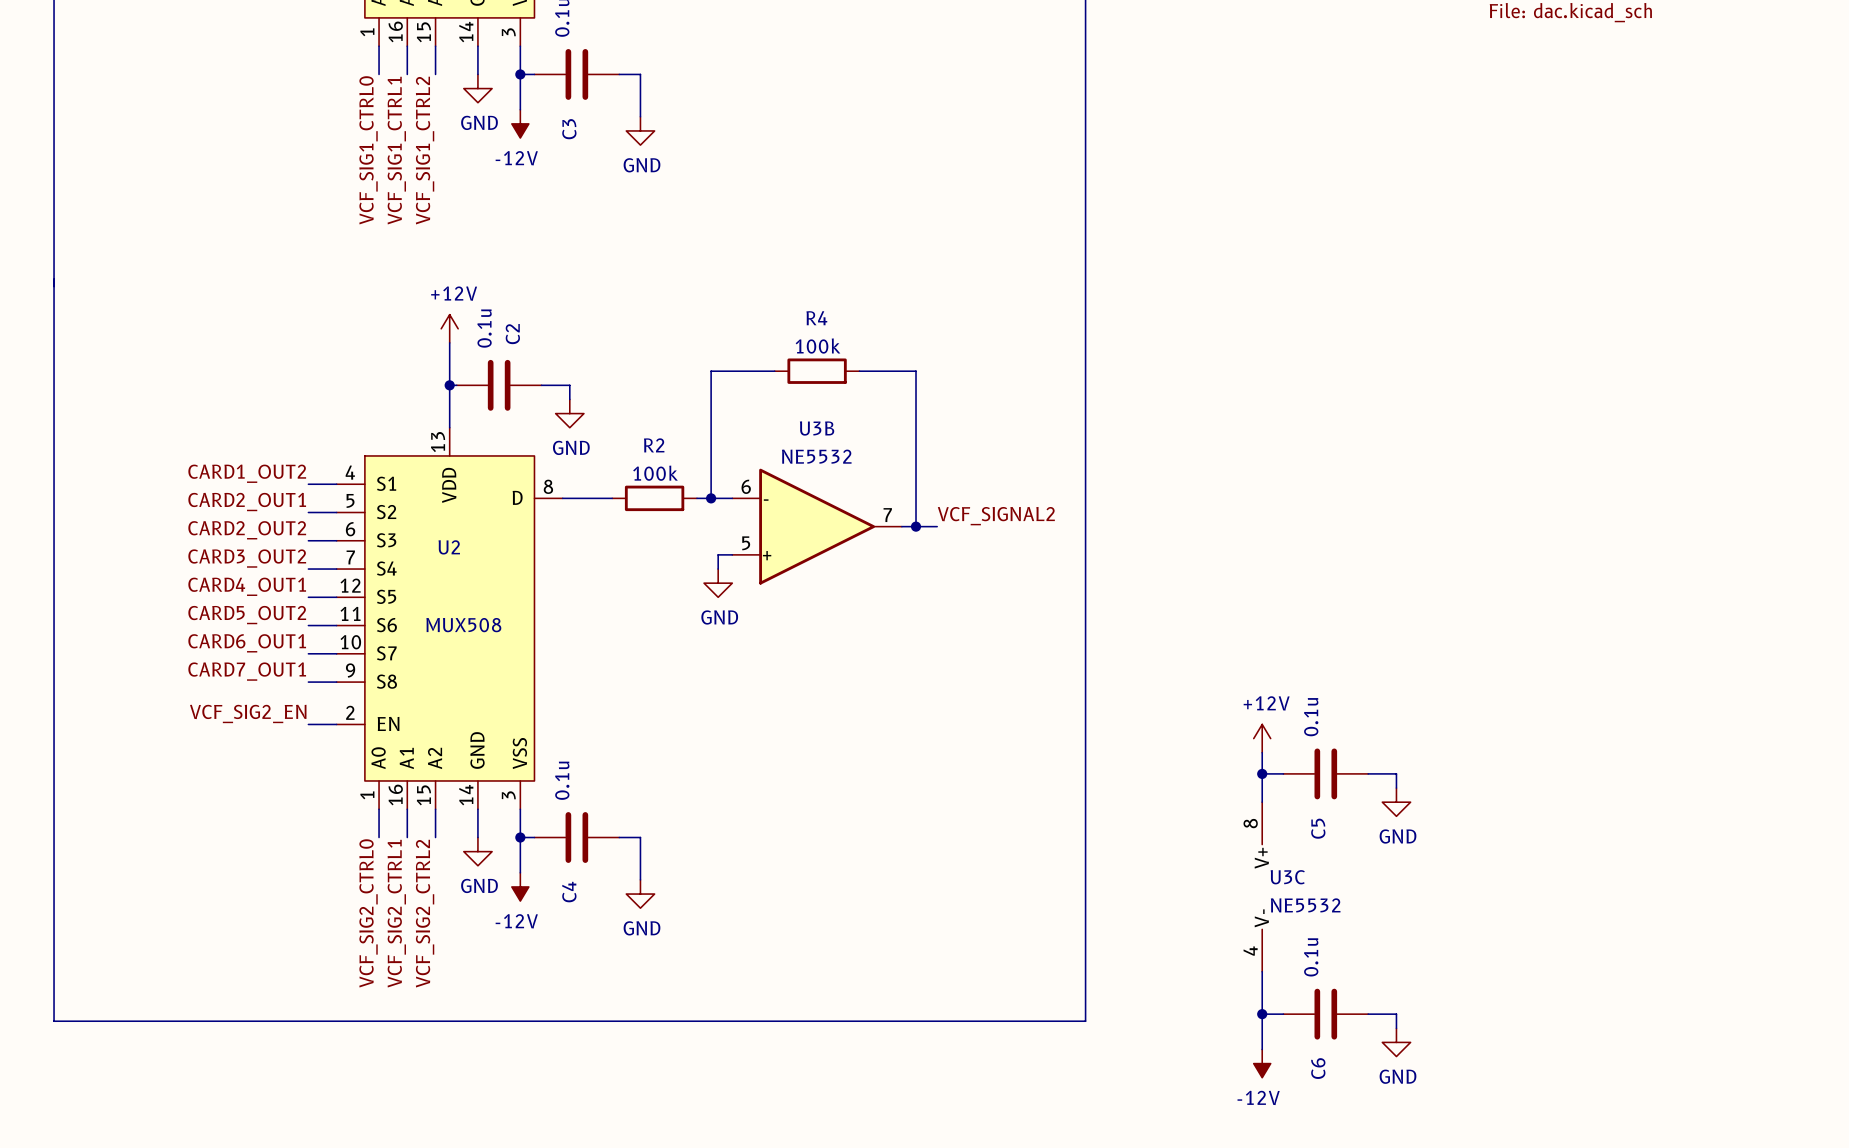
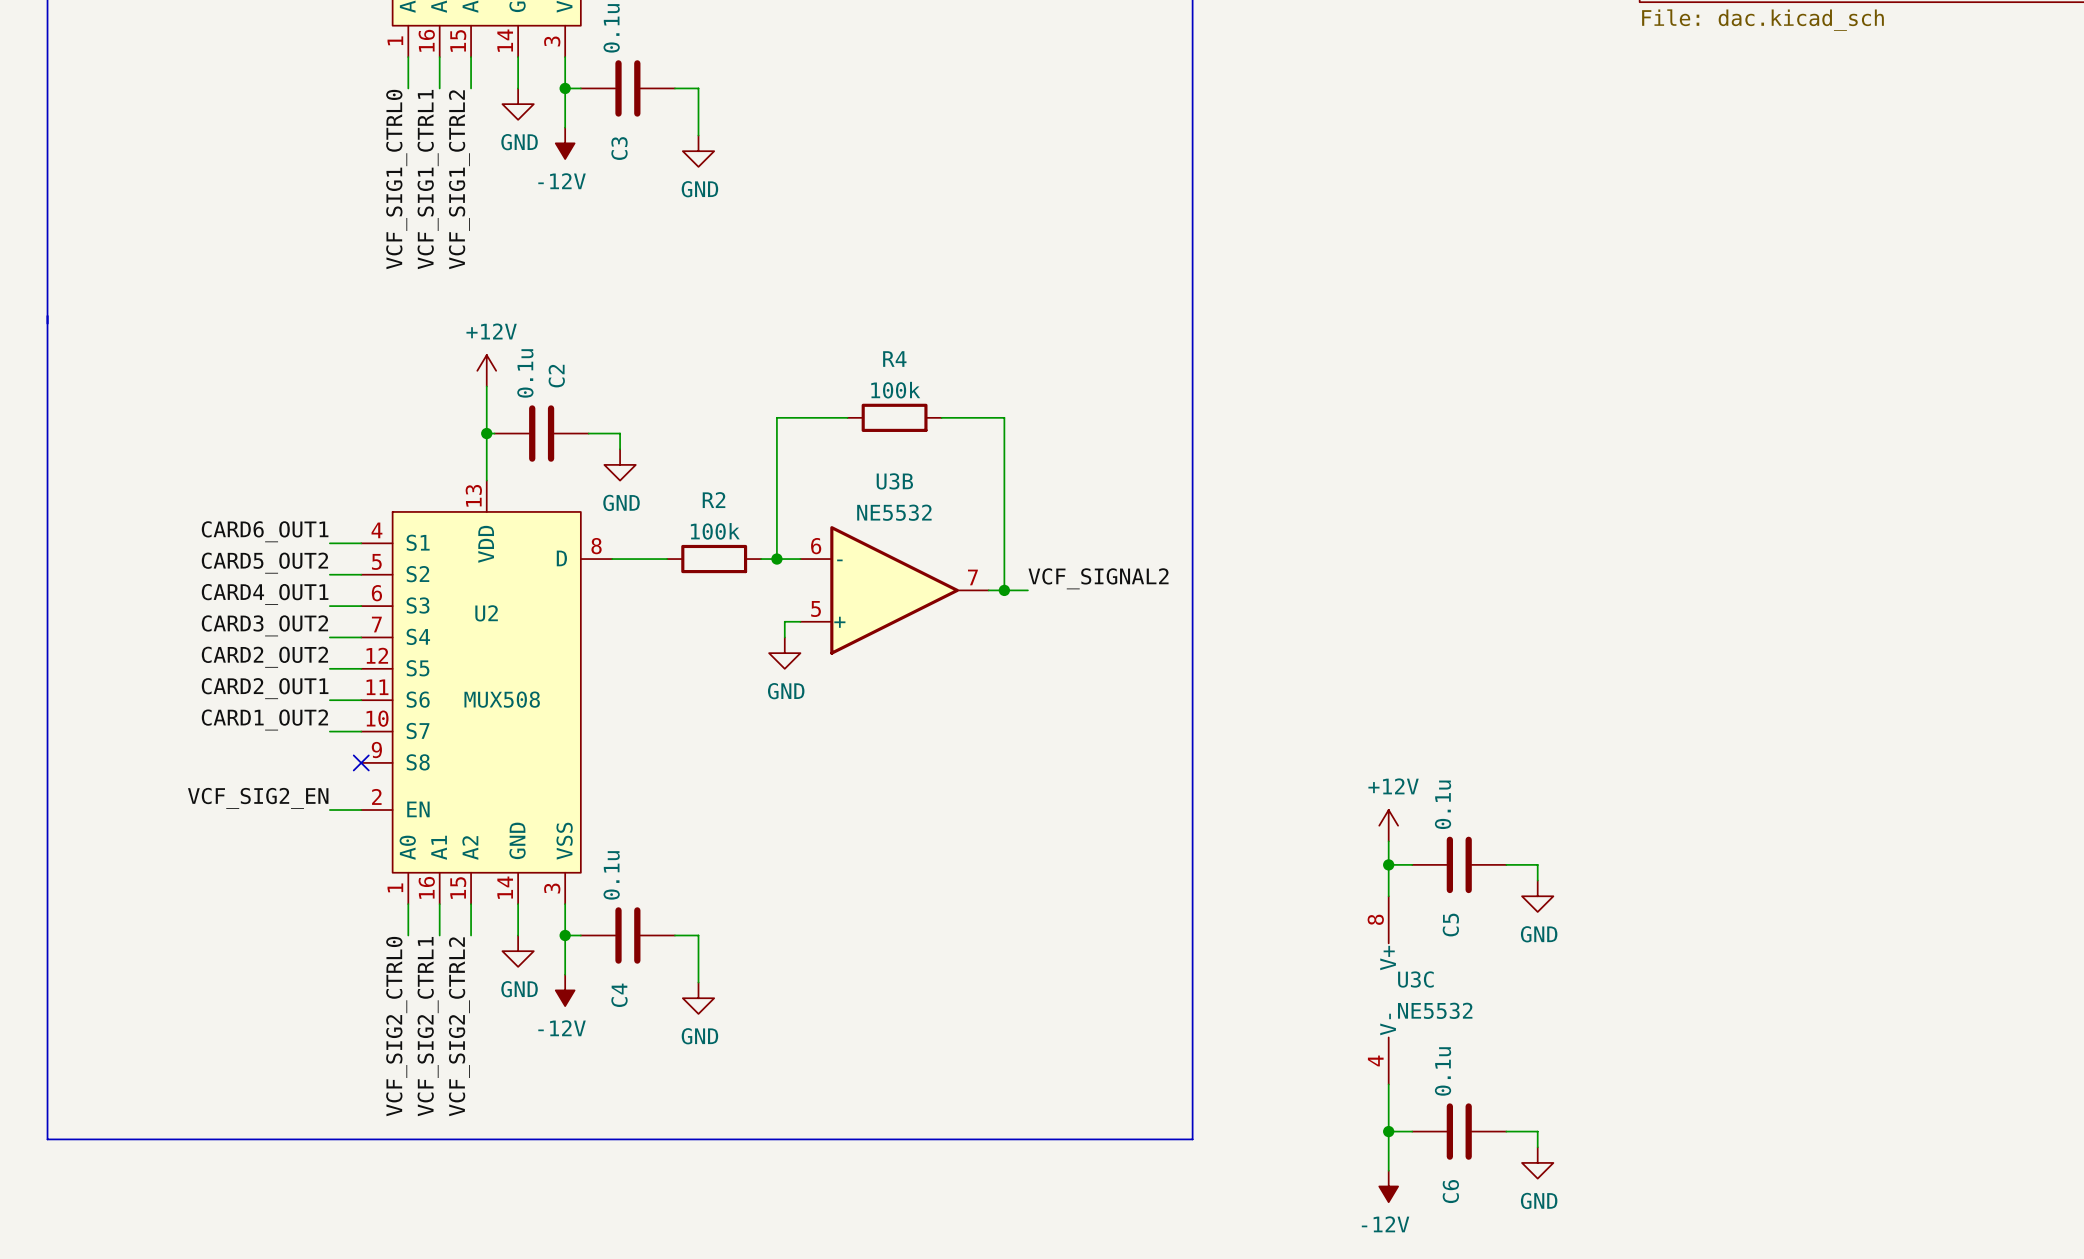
label: CARD1_OUT2 (247, 473) -> CARD6_OUT1 (265, 531)
label: CARD2_OUT1 (247, 502) -> CARD5_OUT2 (264, 563)
label: CARD2_OUT2 (247, 530) -> CARD4_OUT1 (265, 594)
label: CARD4_OUT1 (247, 586) -> CARD2_OUT2 (264, 657)
label: CARD5_OUT2 (247, 615) -> CARD2_OUT1 (265, 688)
label: CARD6_OUT1 (247, 643) -> CARD1_OUT2 (264, 719)
label: CARD7_OUT1 (247, 671) -> none
wire: (308, 682) (336, 682) -> none
no-connect mark: none -> (361, 762)

